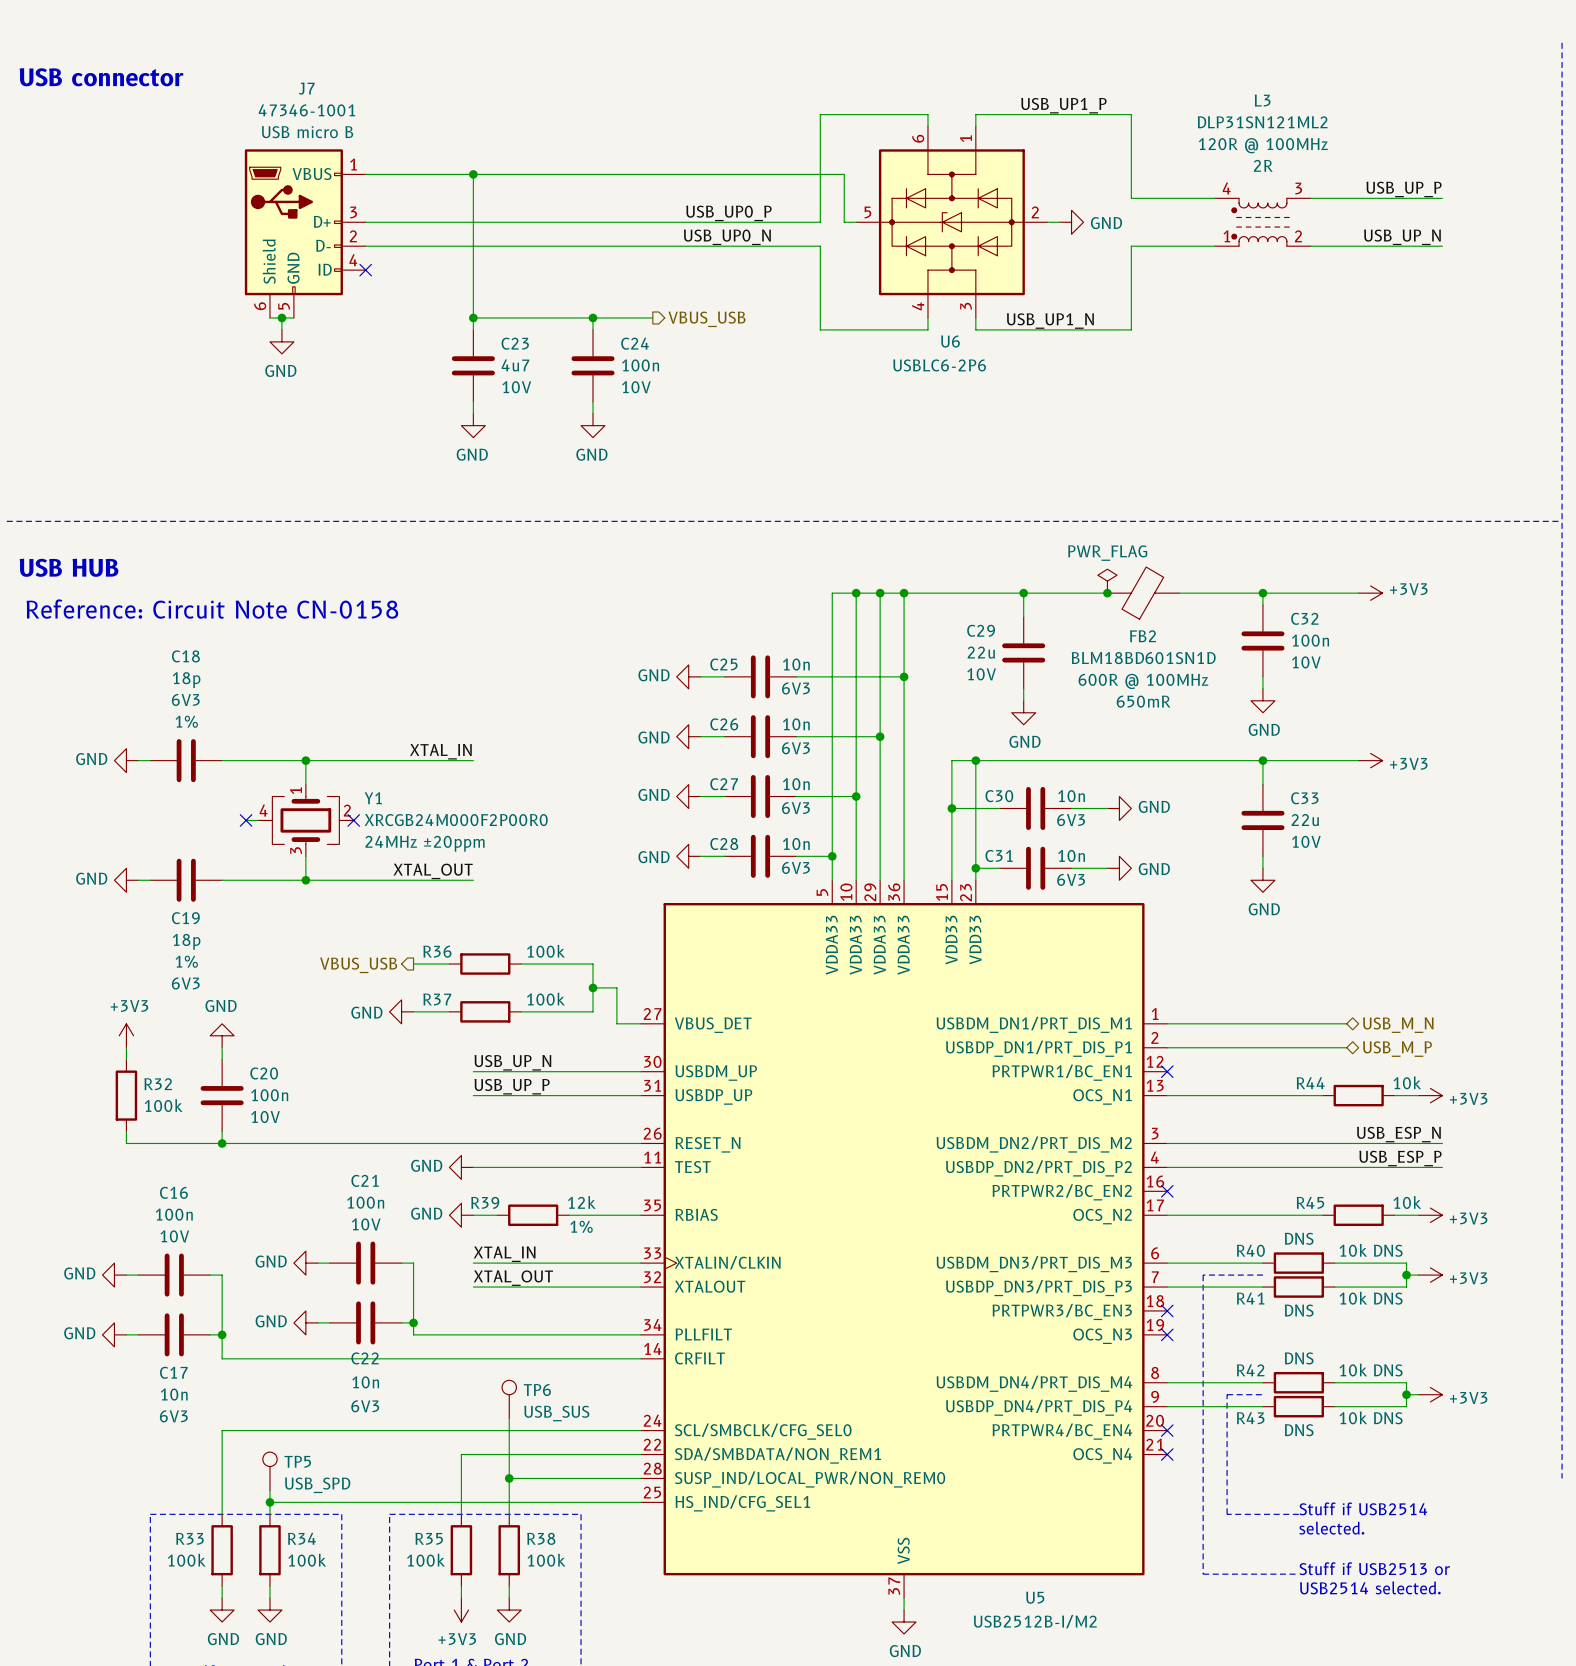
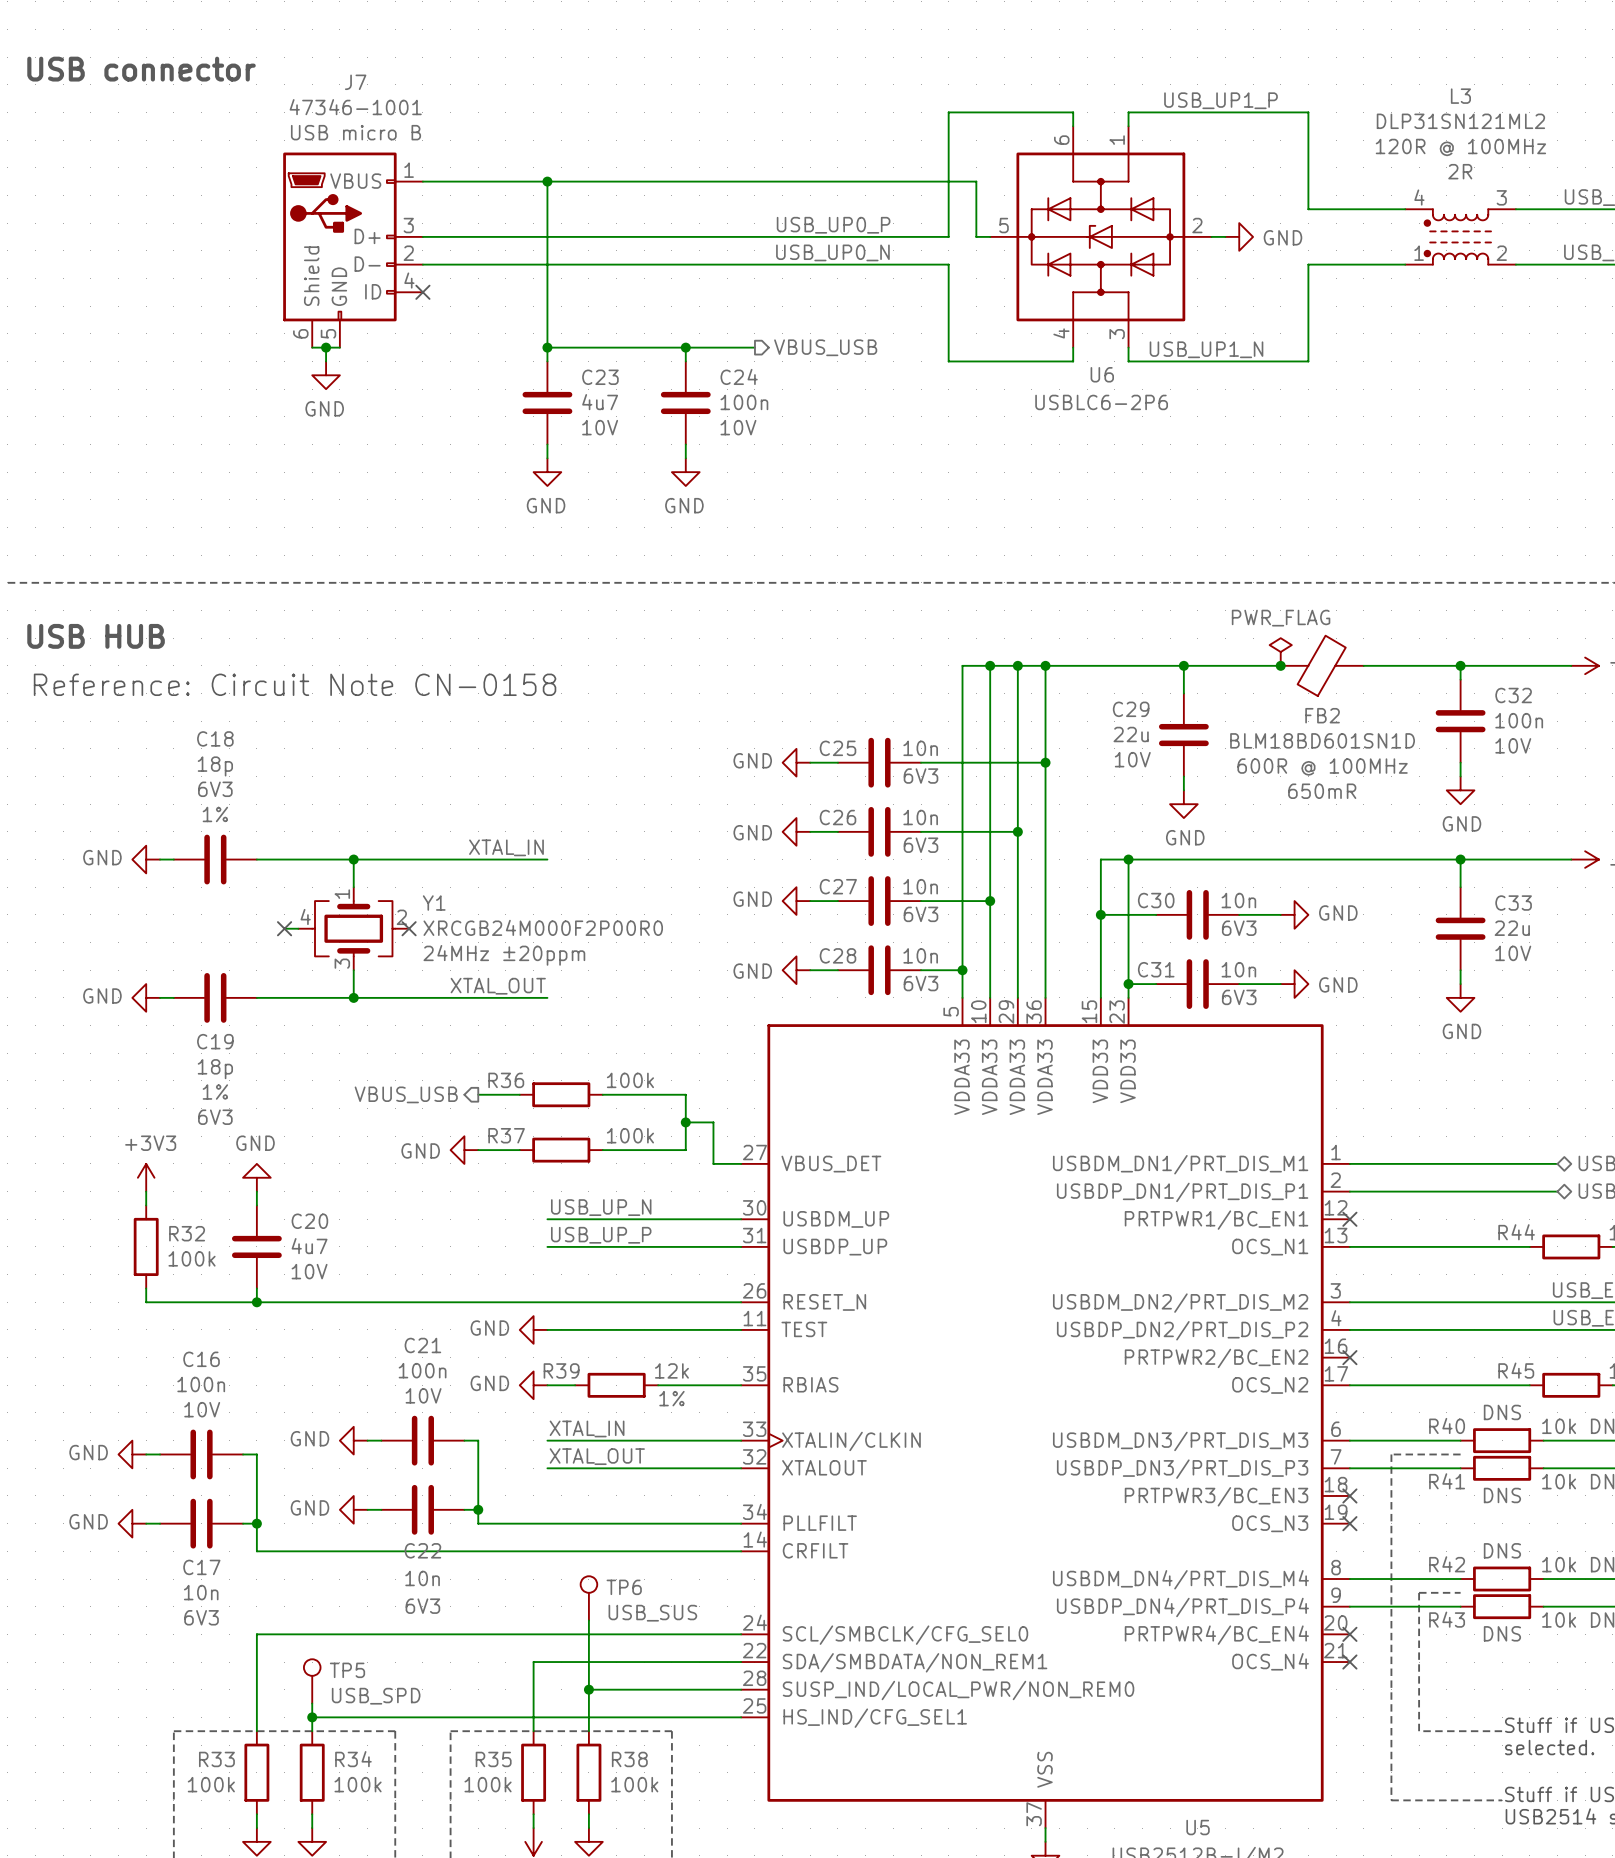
C20 value: 100n (269, 1095) -> 4u7 (309, 1246)

